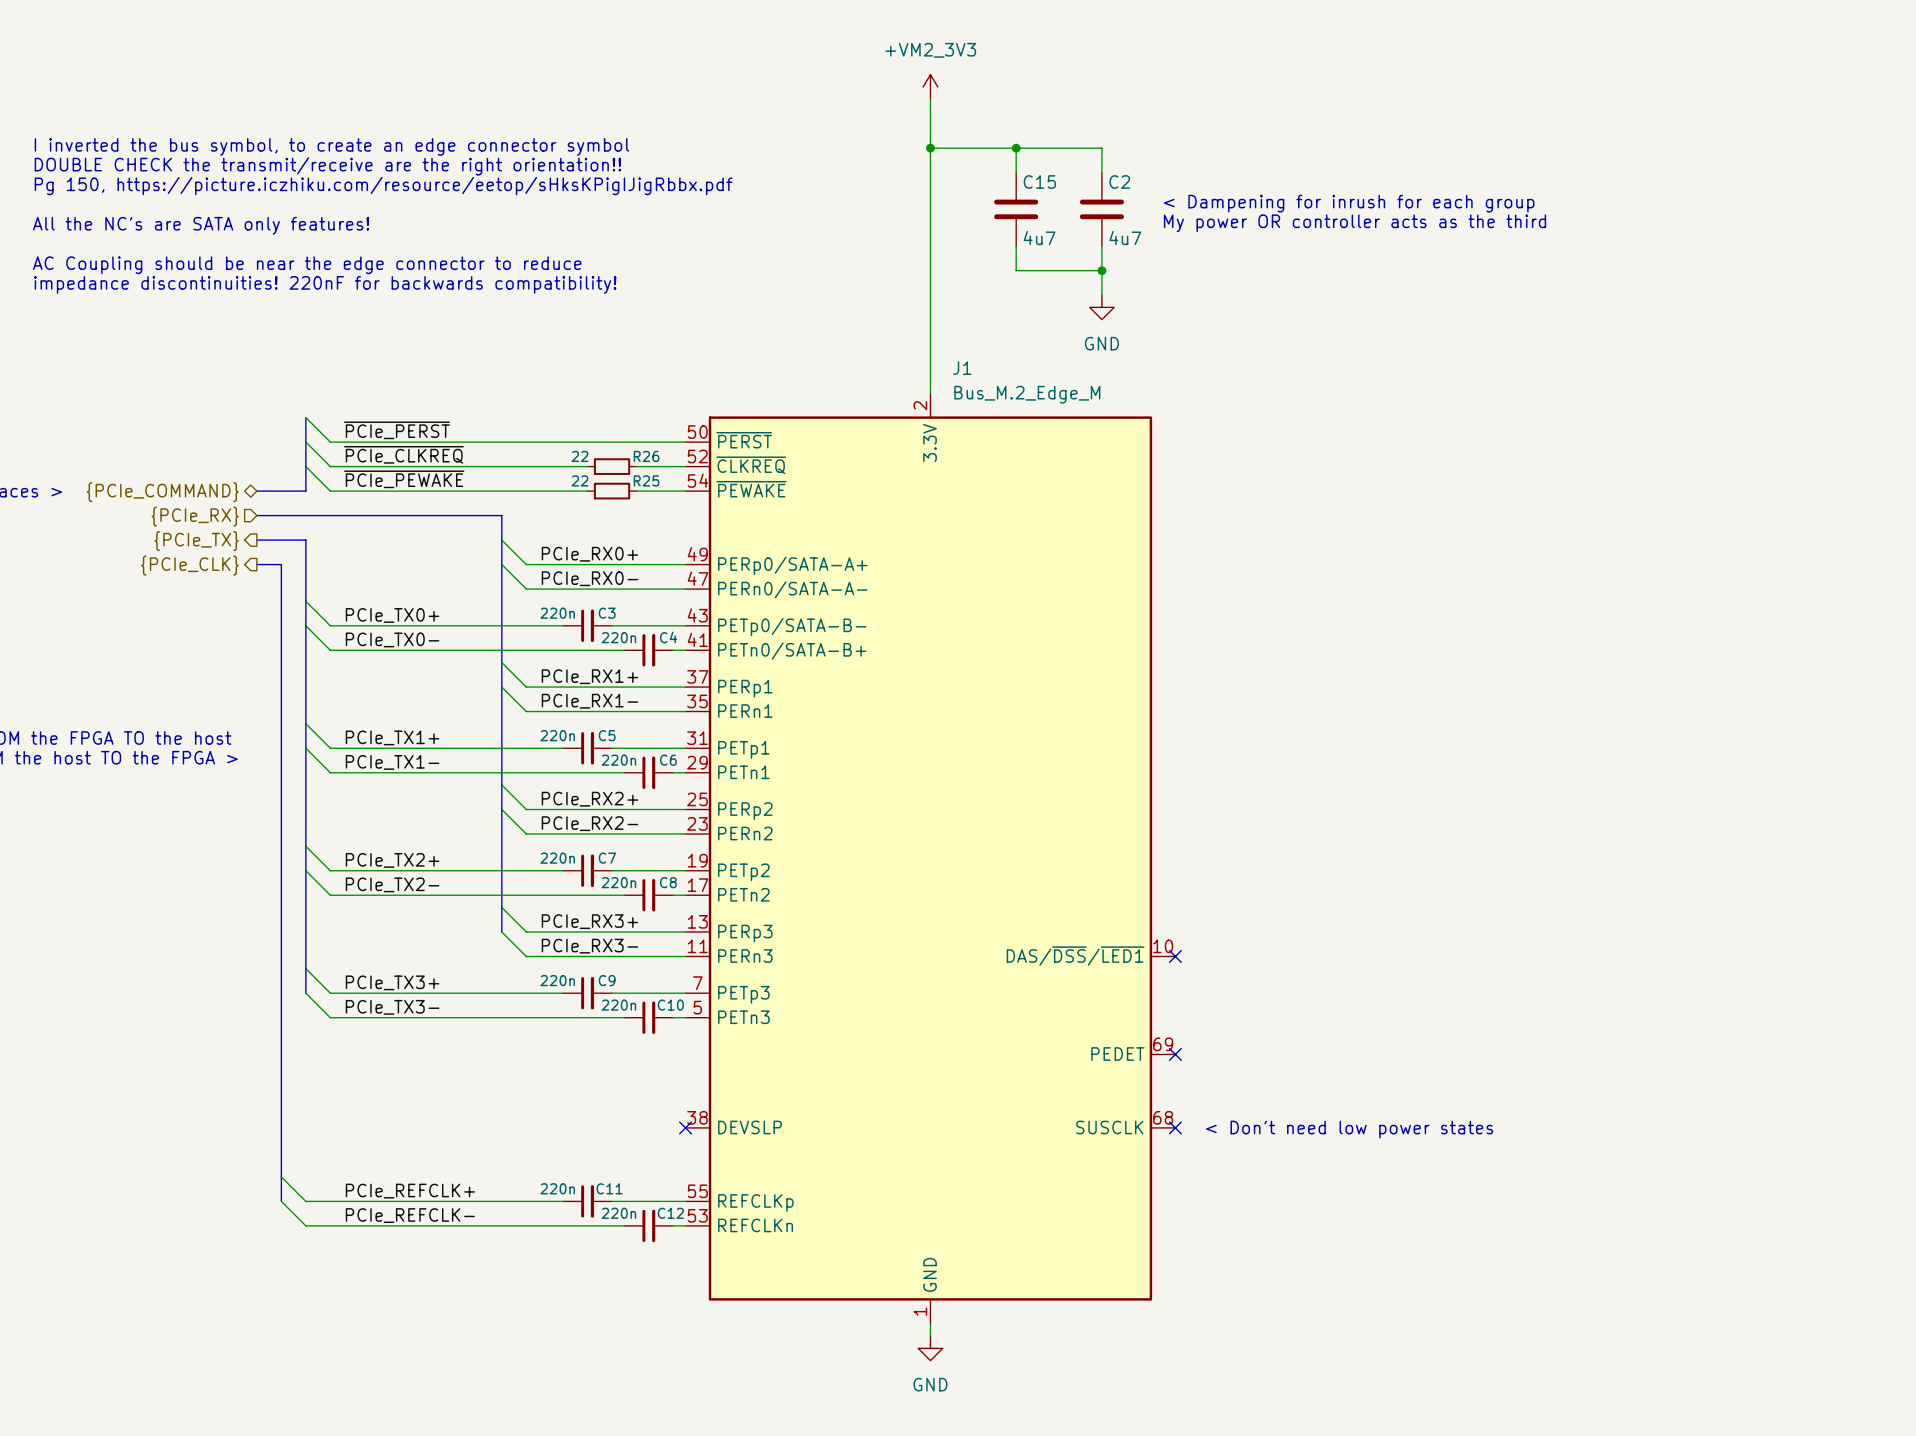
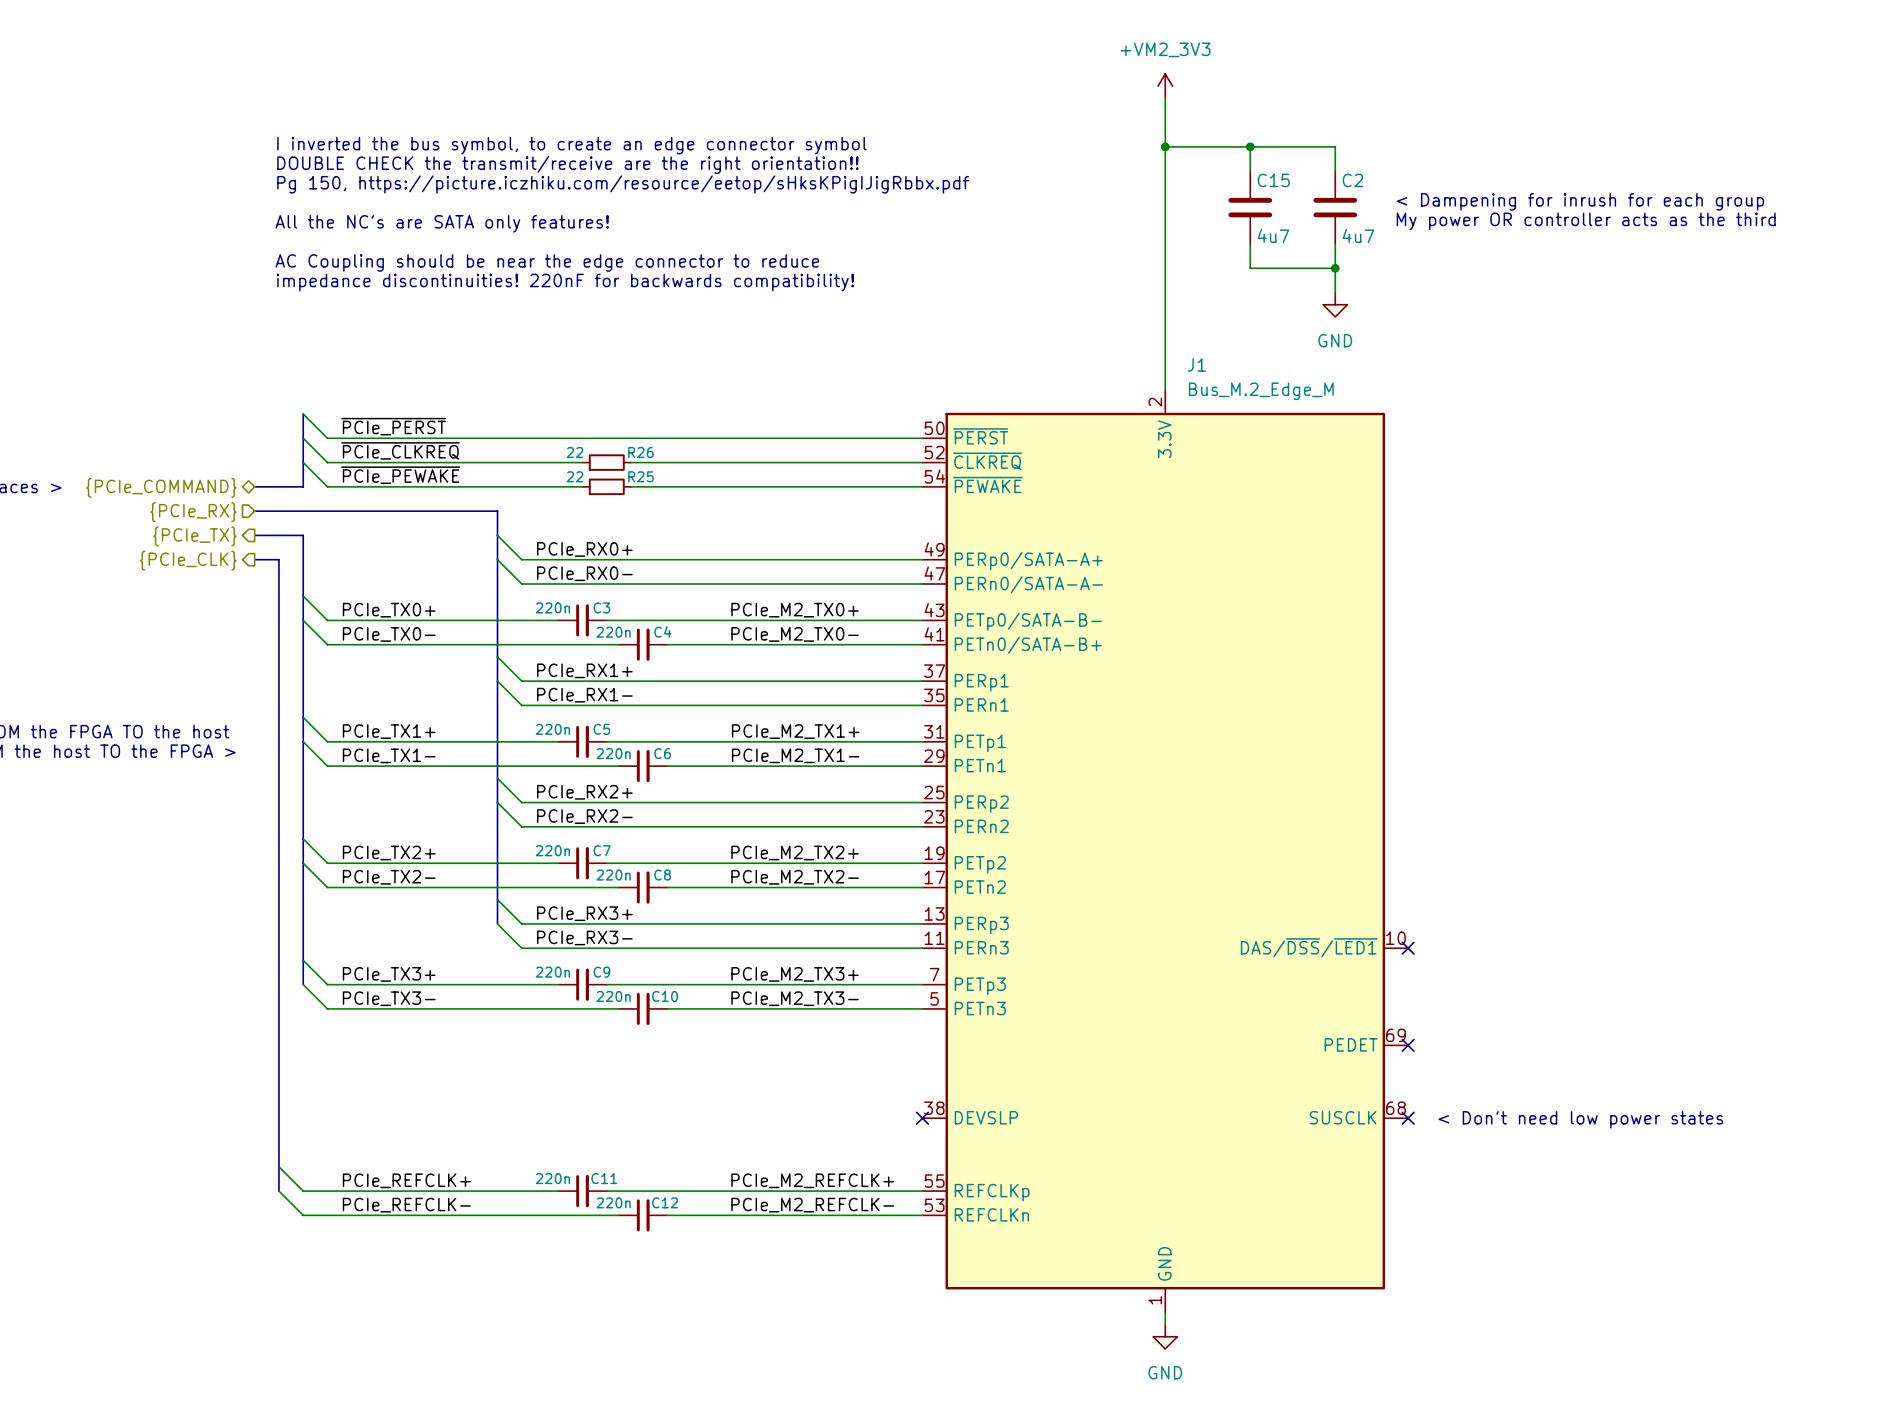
power symbol: +VM2_3V3 (930, 86) -> none
power symbol: none -> +VM2_3V3 (1165, 86)
wire: (930, 99) (930, 393) -> none
wire: none -> (1165, 98) (1165, 389)
text: I inverted the bus symbol, to create an edge connector symbol (331, 146) -> none
text: none -> I inverted the bus symbol, to create an edge connector symbol (571, 145)
wire: (930, 148) (1101, 148) (1101, 172) -> none
junction: (930, 148) -> none
wire: (1016, 148) (1016, 172) -> none
junction: (1016, 148) -> none
wire: none -> (1165, 146) (1335, 146) (1335, 171)
junction: none -> (1165, 146)
wire: none -> (1250, 146) (1250, 171)
junction: none -> (1250, 146)
text: DOUBLE CHECK the transmit/receive are the right orientation!! (327, 166) -> none
text: none -> DOUBLE CHECK the transmit/receive are the right orientation!! (567, 164)
text: Pg 150, https://picture.iczhiku.com/resource/eetop/sHksKPigIJigRbbx.pdf (383, 186) -> none
text: none -> Pg 150, https://picture.iczhiku.com/resource/eetop/sHksKPigIJigRbbx.pdf (623, 184)
text: < Dampening for inrush for each group (1349, 203) -> none
text: none -> < Dampening for inrush for each group (1580, 201)
C15 position: (1016, 209) -> (1250, 207)
C2 position: (1101, 209) -> (1335, 207)
text: My power OR controller acts as the third (1355, 223) -> none
text: none -> My power OR controller acts as the third (1586, 221)
text: All the NC's are SATA only features! (201, 225) -> none
text: none -> All the NC's are SATA only features! (442, 223)
wire: (1016, 246) (1016, 270) (1101, 270) -> none
wire: (1101, 246) (1101, 295) -> none
wire: none -> (1250, 244) (1250, 268) (1335, 268)
wire: none -> (1335, 244) (1335, 292)
text: AC Coupling should be near the edge connector to reduce (307, 265) -> none
text: none -> AC Coupling should be near the edge connector to reduce (547, 262)
junction: (1101, 270) -> none
junction: none -> (1335, 268)
text: impedance discontinuities! 220nF for backwards compatibility! (325, 284) -> none
text: none -> impedance discontinuities! 220nF for backwards compatibility! (565, 282)
power symbol: GND (1101, 307) -> none
power symbol: none -> GND (1335, 304)
label: none -> PCIe_M2_TX0+ (795, 610)
label: none -> PCIe_M2_TX0- (795, 634)
label: none -> PCIe_M2_TX1+ (795, 731)
label: none -> PCIe_M2_TX1- (795, 755)
J1 position: (930, 858) -> (1165, 851)
label: none -> PCIe_M2_TX2+ (795, 852)
label: none -> PCIe_M2_TX2- (795, 877)
no-connect mark: (1175, 956) -> none
no-connect mark: none -> (1408, 948)
label: none -> PCIe_M2_TX3+ (795, 974)
label: none -> PCIe_M2_TX3- (795, 998)
no-connect mark: (1175, 1054) -> none
no-connect mark: none -> (1408, 1045)
no-connect mark: (685, 1127) -> none
no-connect mark: none -> (922, 1118)
no-connect mark: (1175, 1127) -> none
no-connect mark: none -> (1408, 1118)
text: < Don't need low power states (1349, 1129) -> none
text: none -> < Don't need low power states (1580, 1119)
label: none -> PCIe_M2_REFCLK+ (812, 1180)
label: none -> PCIe_M2_REFCLK- (812, 1205)
wire: (930, 1323) (930, 1336) -> none
wire: none -> (1165, 1312) (1165, 1324)
power symbol: GND (930, 1348) -> none
power symbol: none -> GND (1165, 1336)

